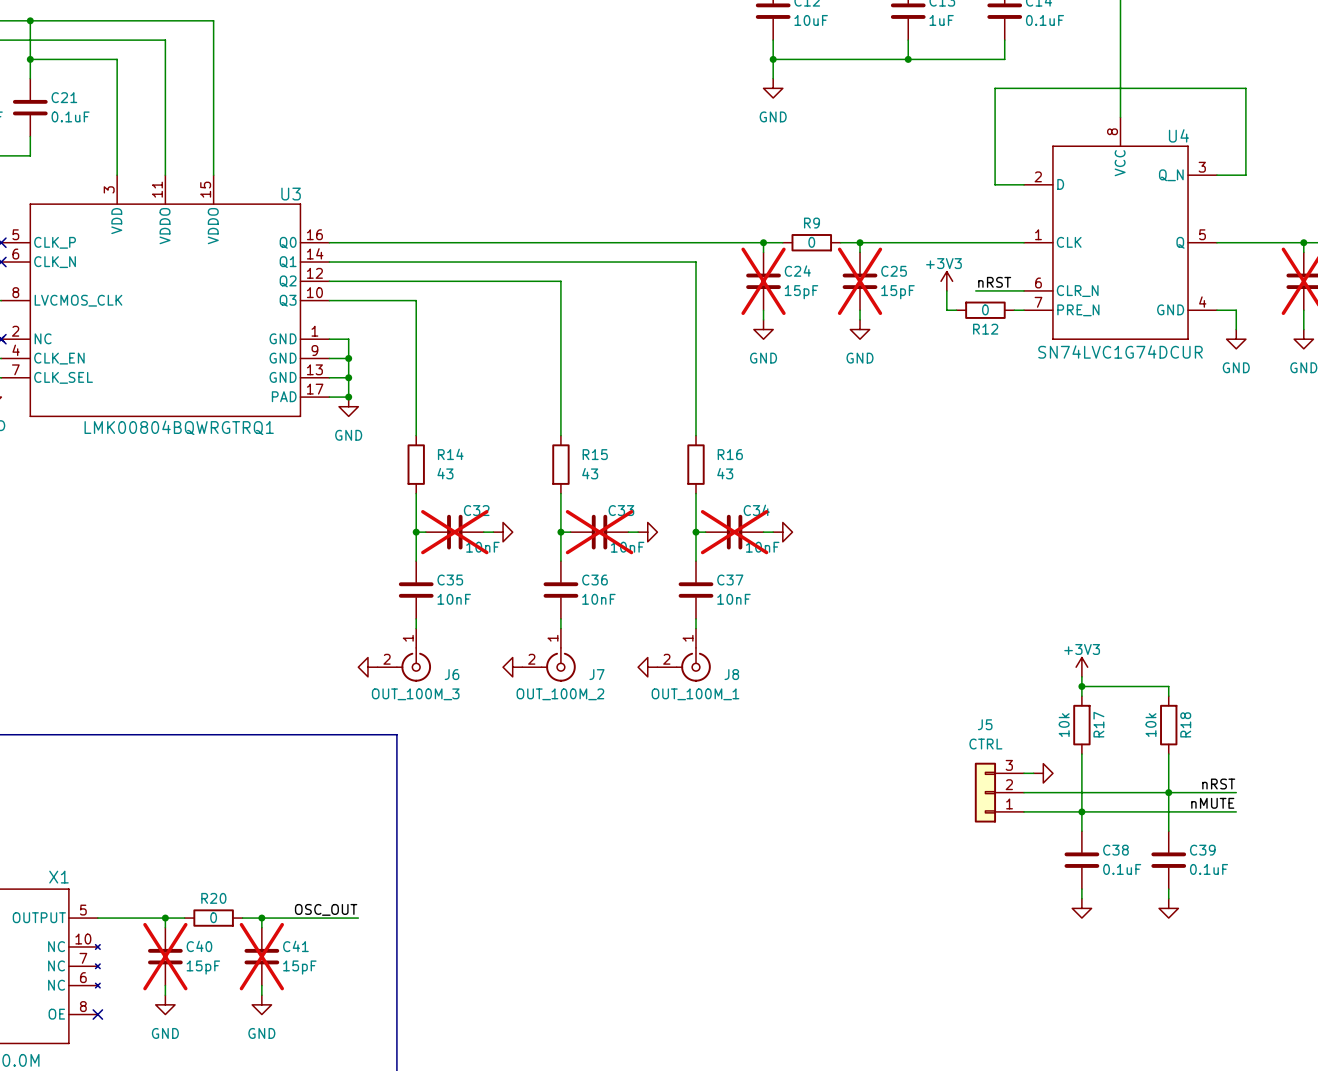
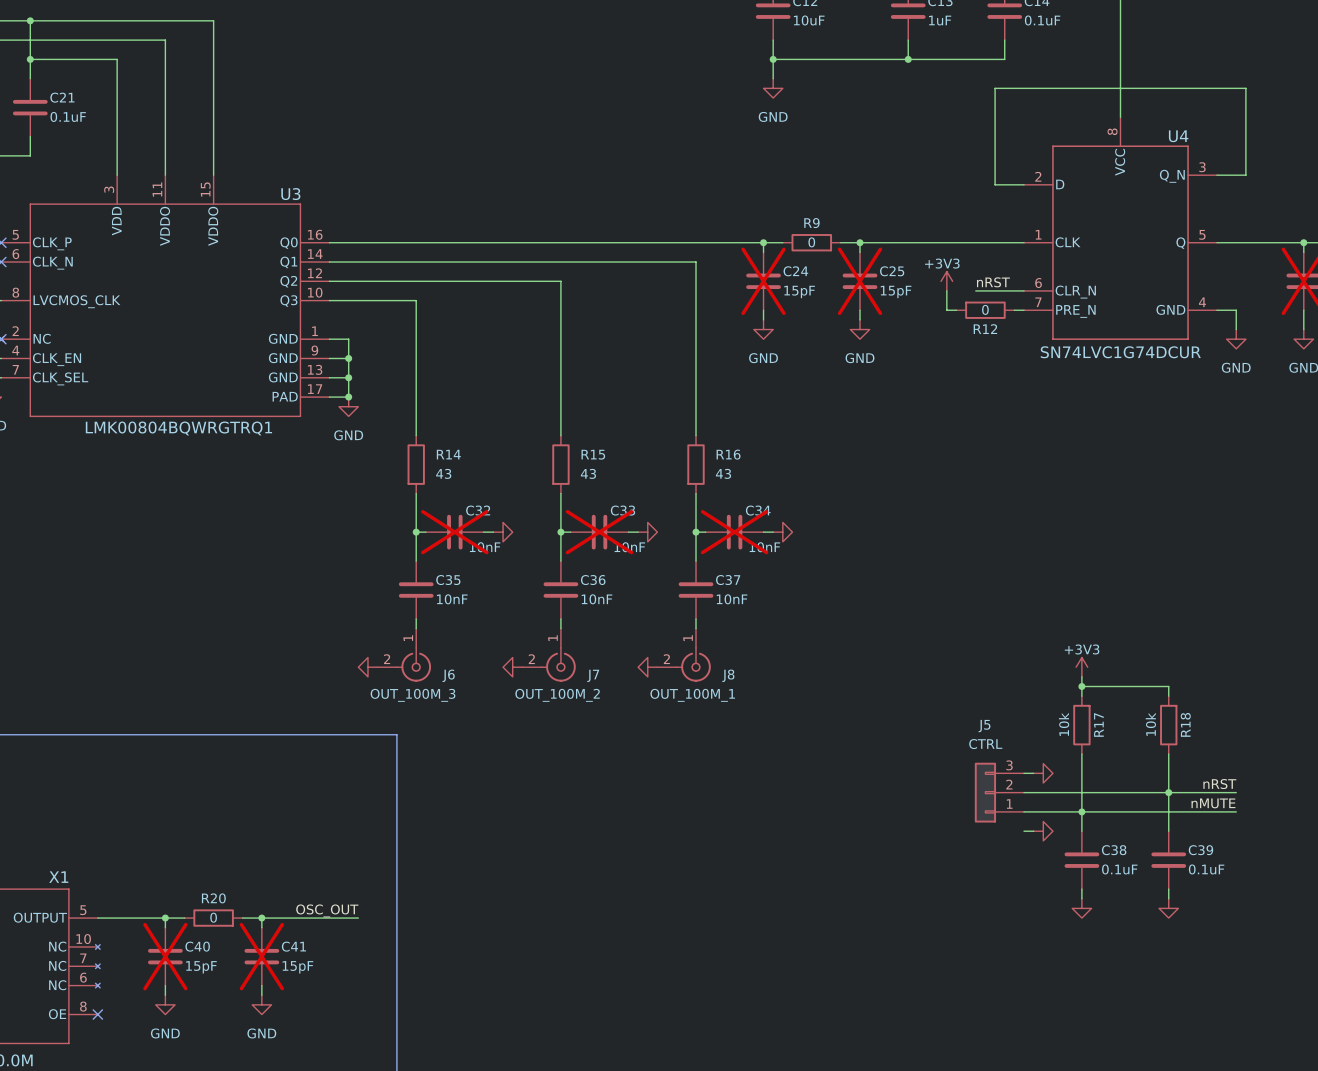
wire: none -> (1024, 831) (1033, 831)
power symbol: none -> (1043, 831)

